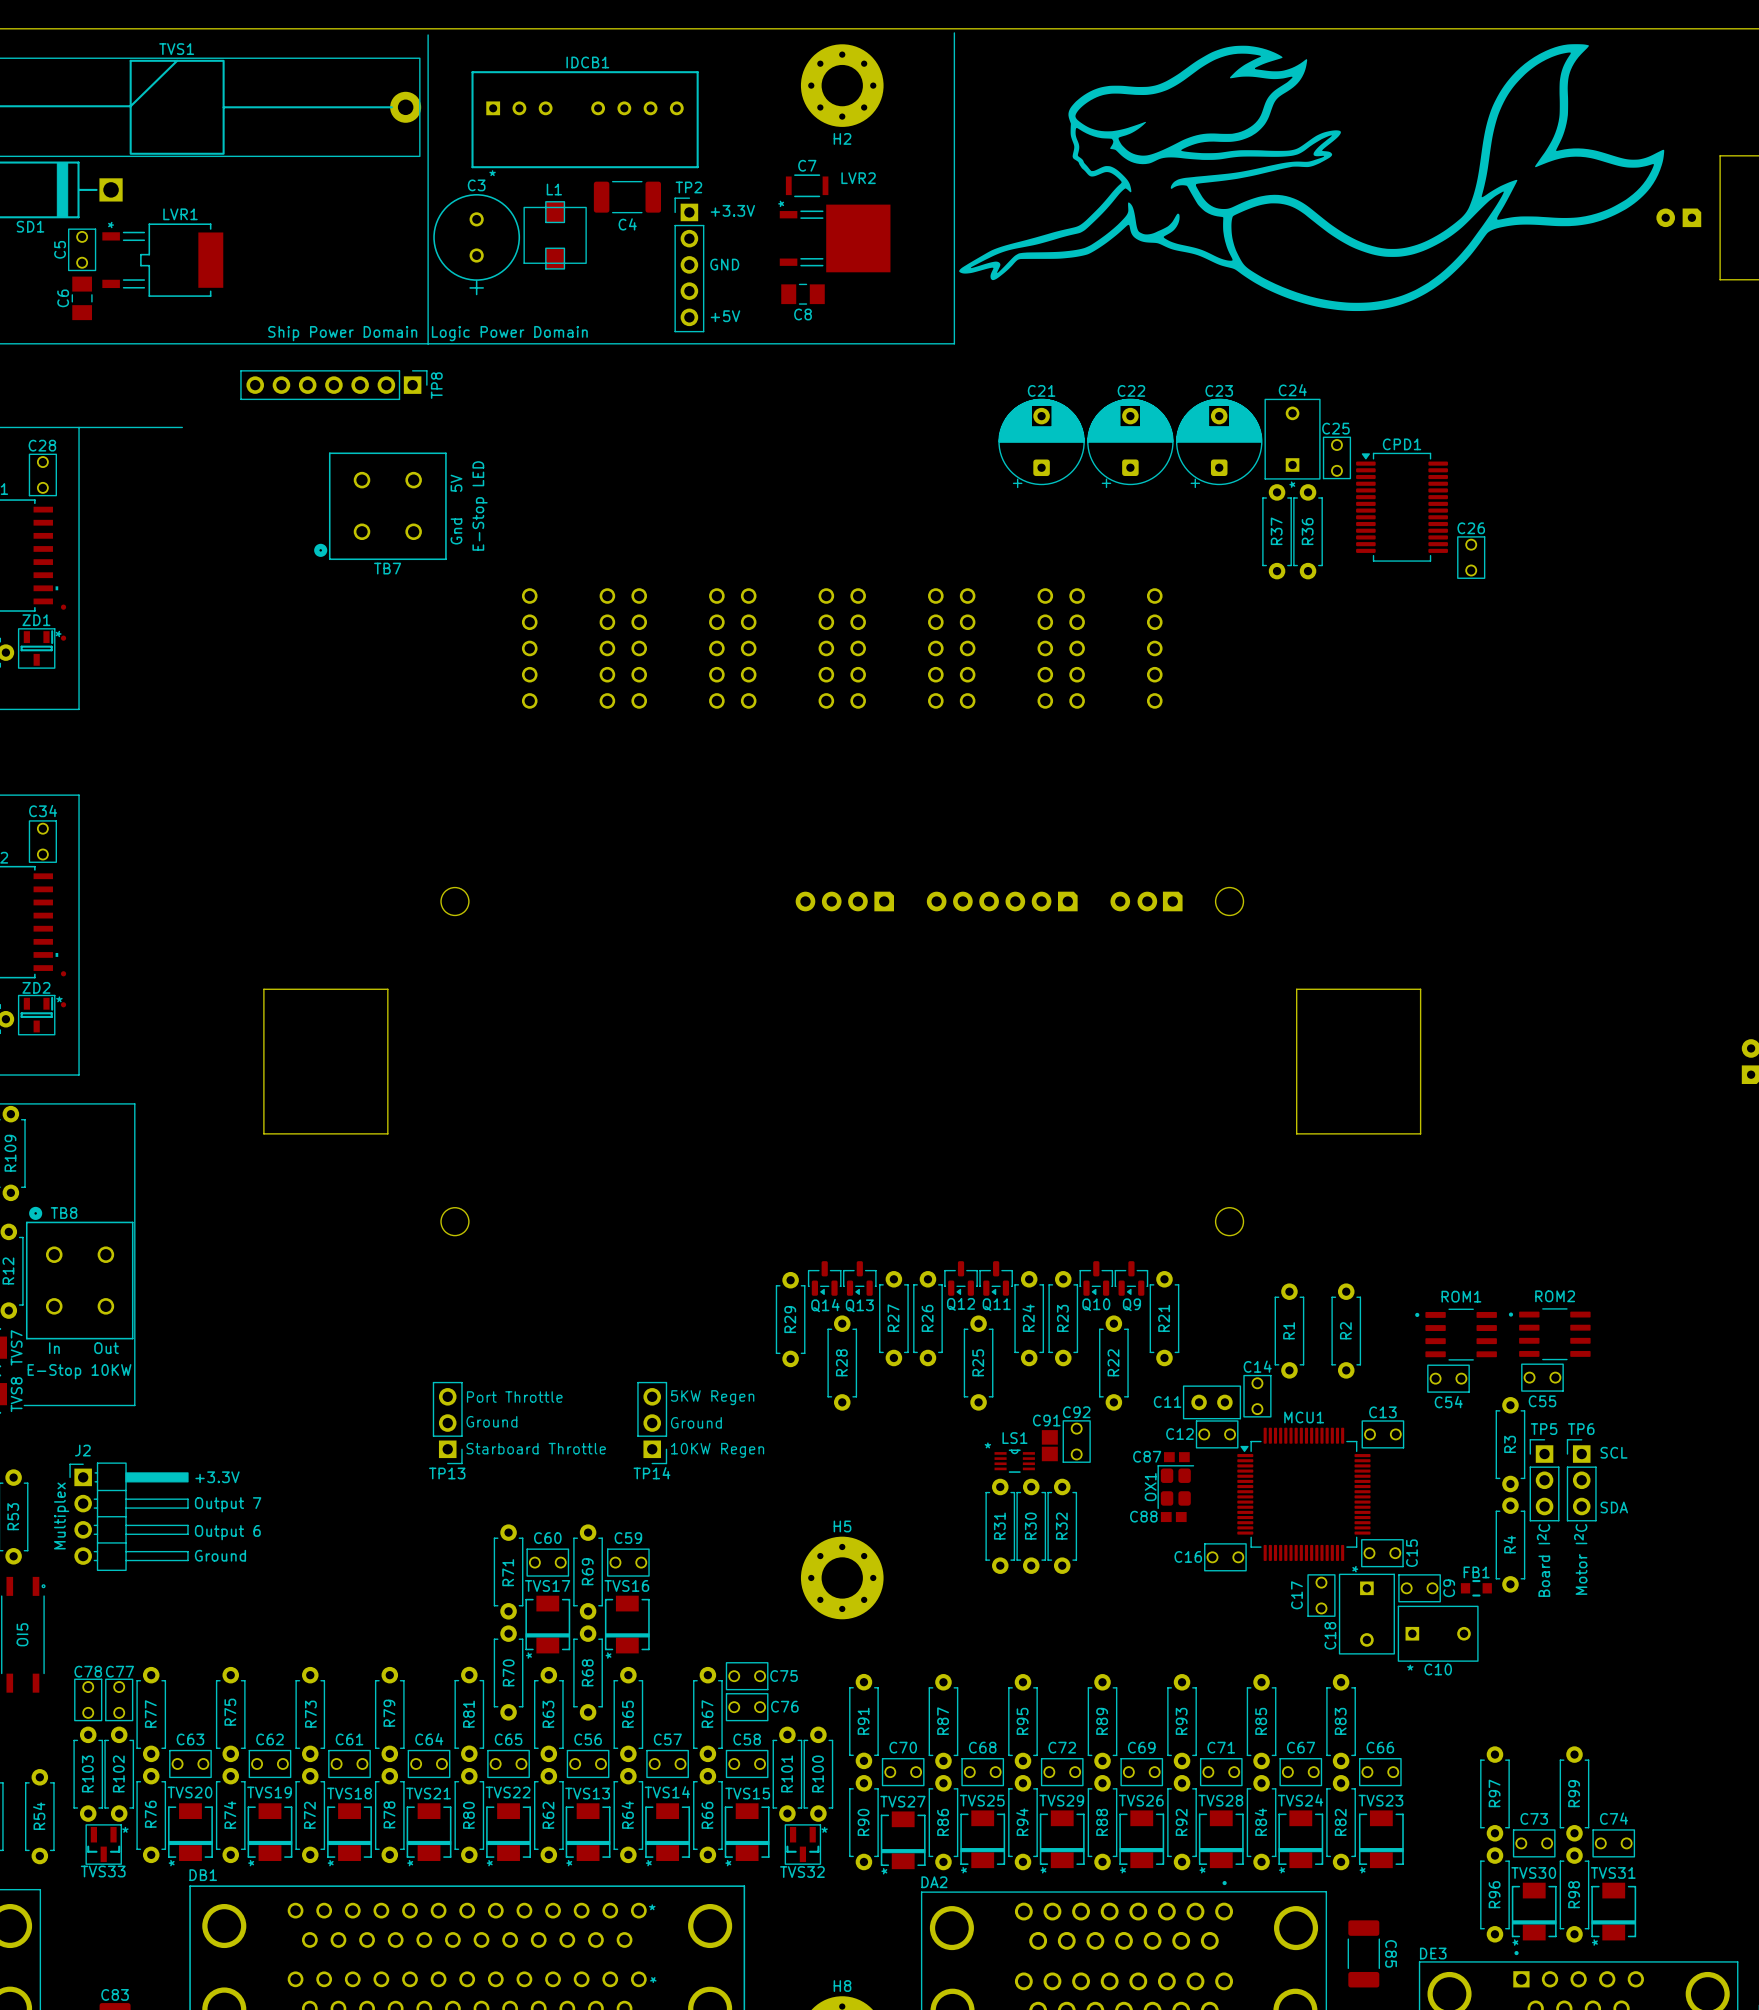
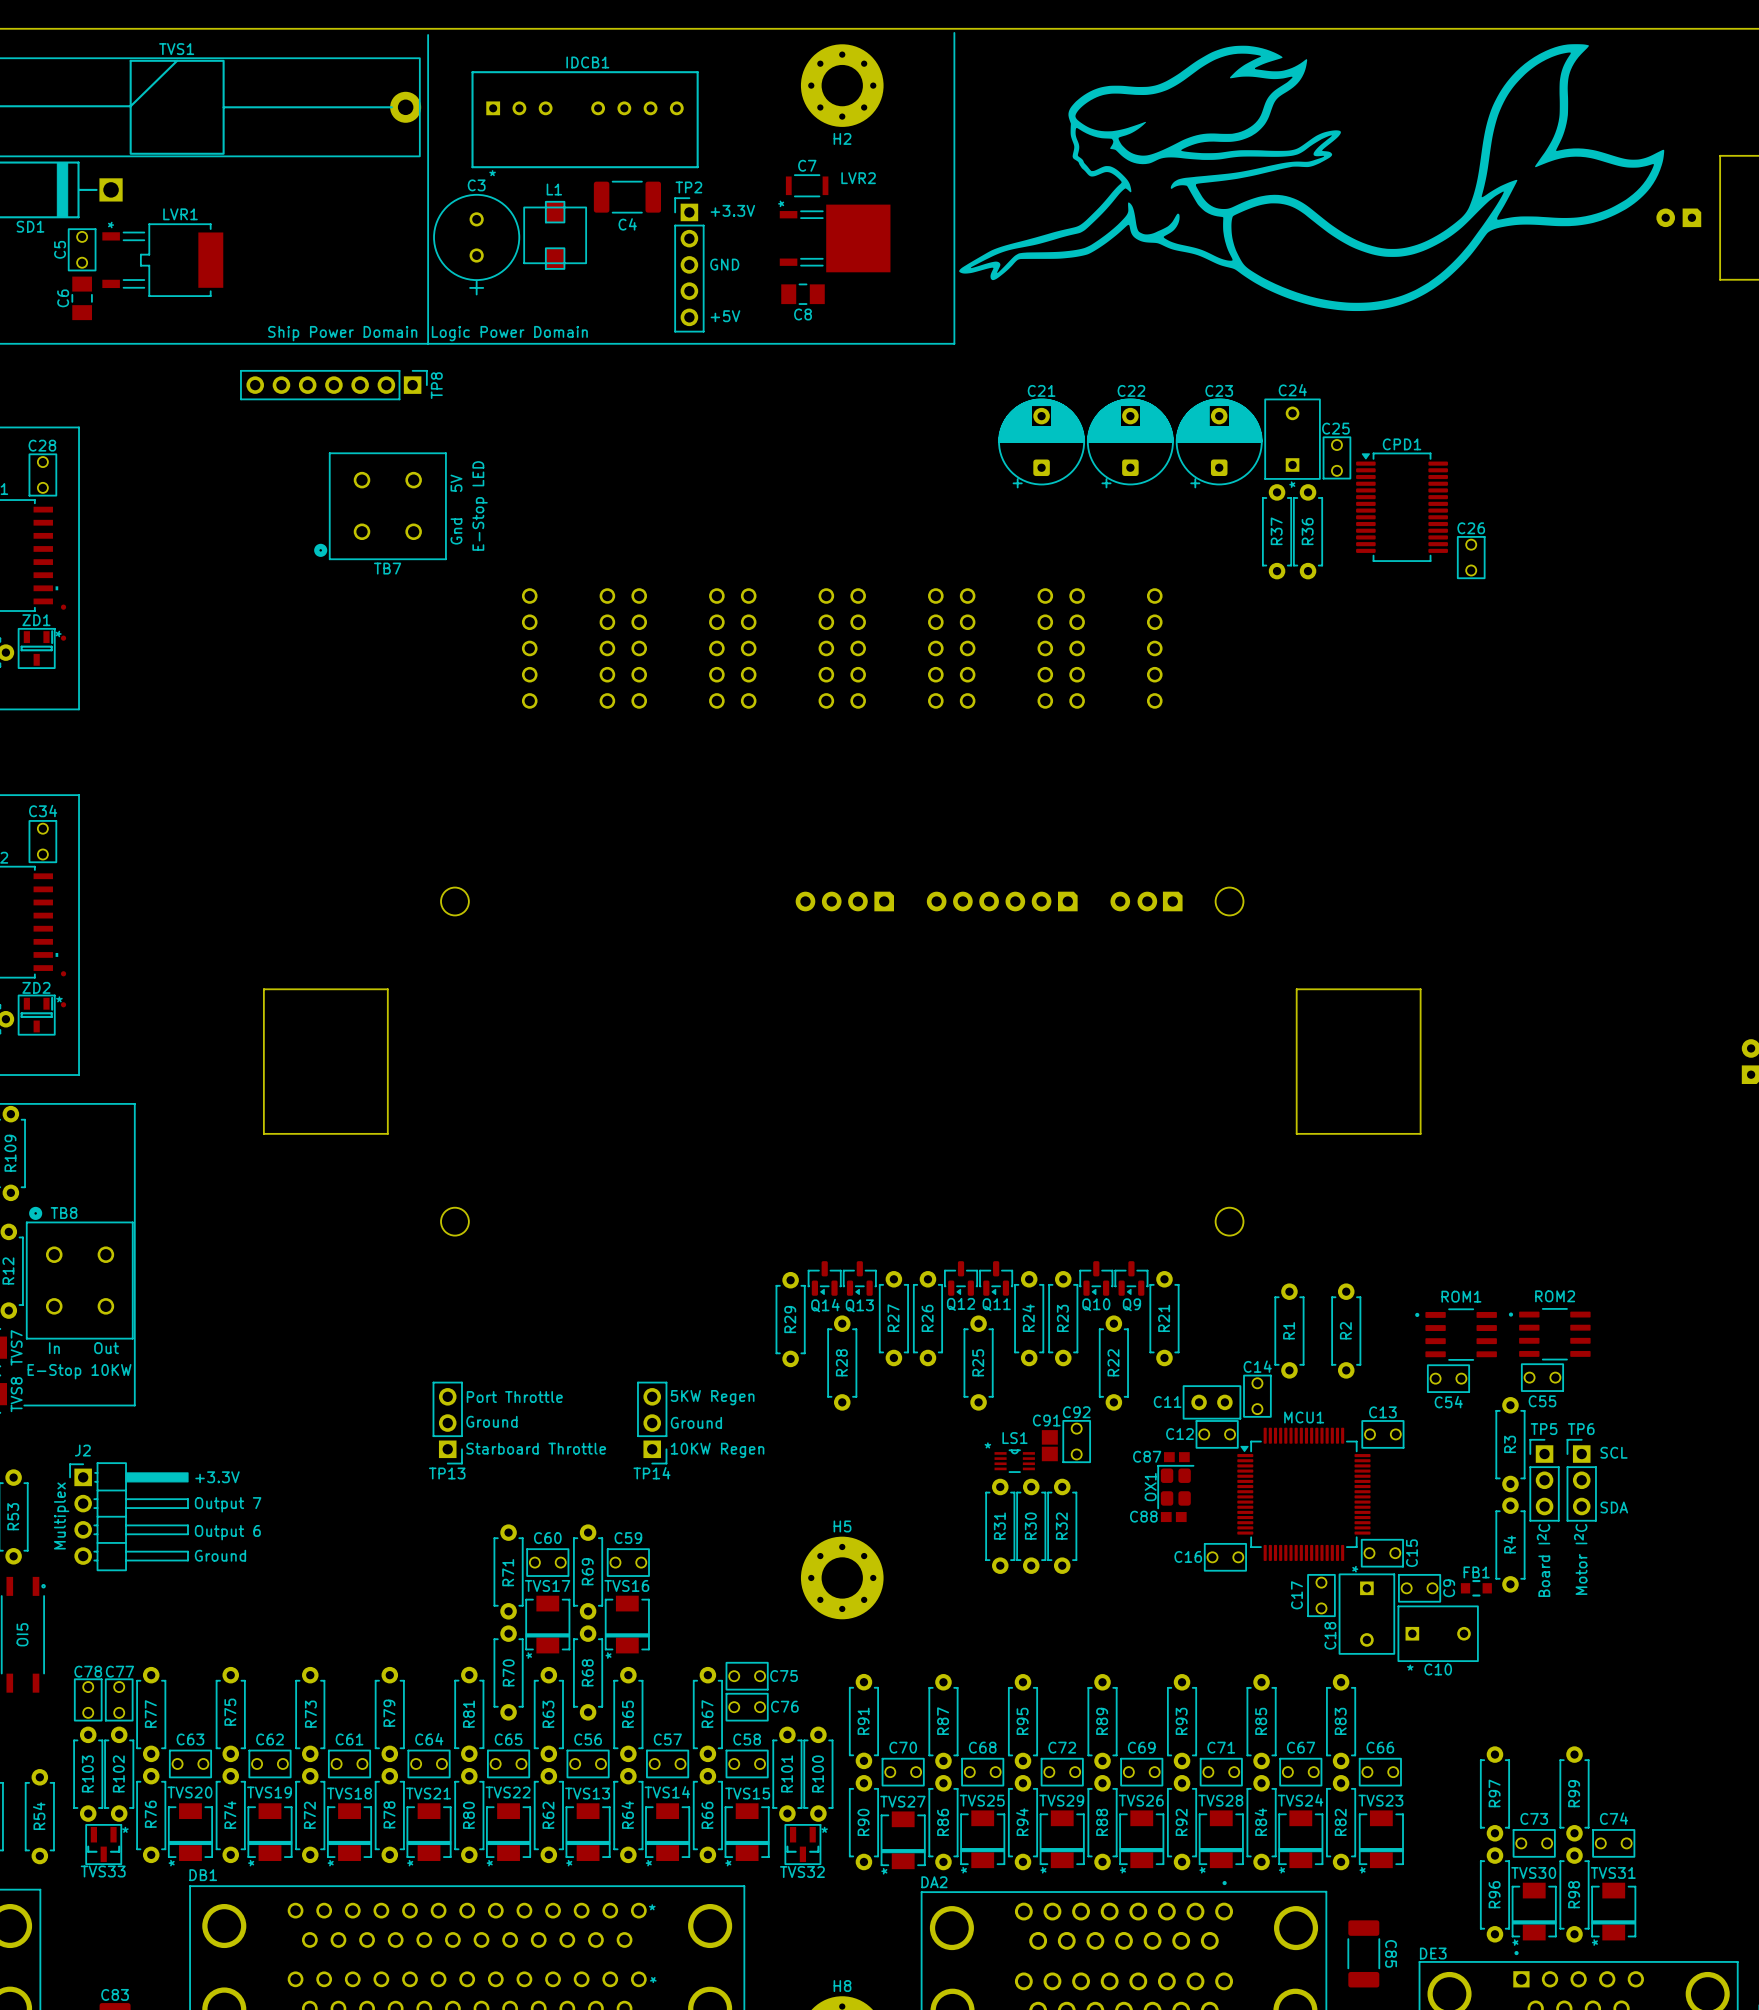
line: (79, 427) (182, 427) -> none

